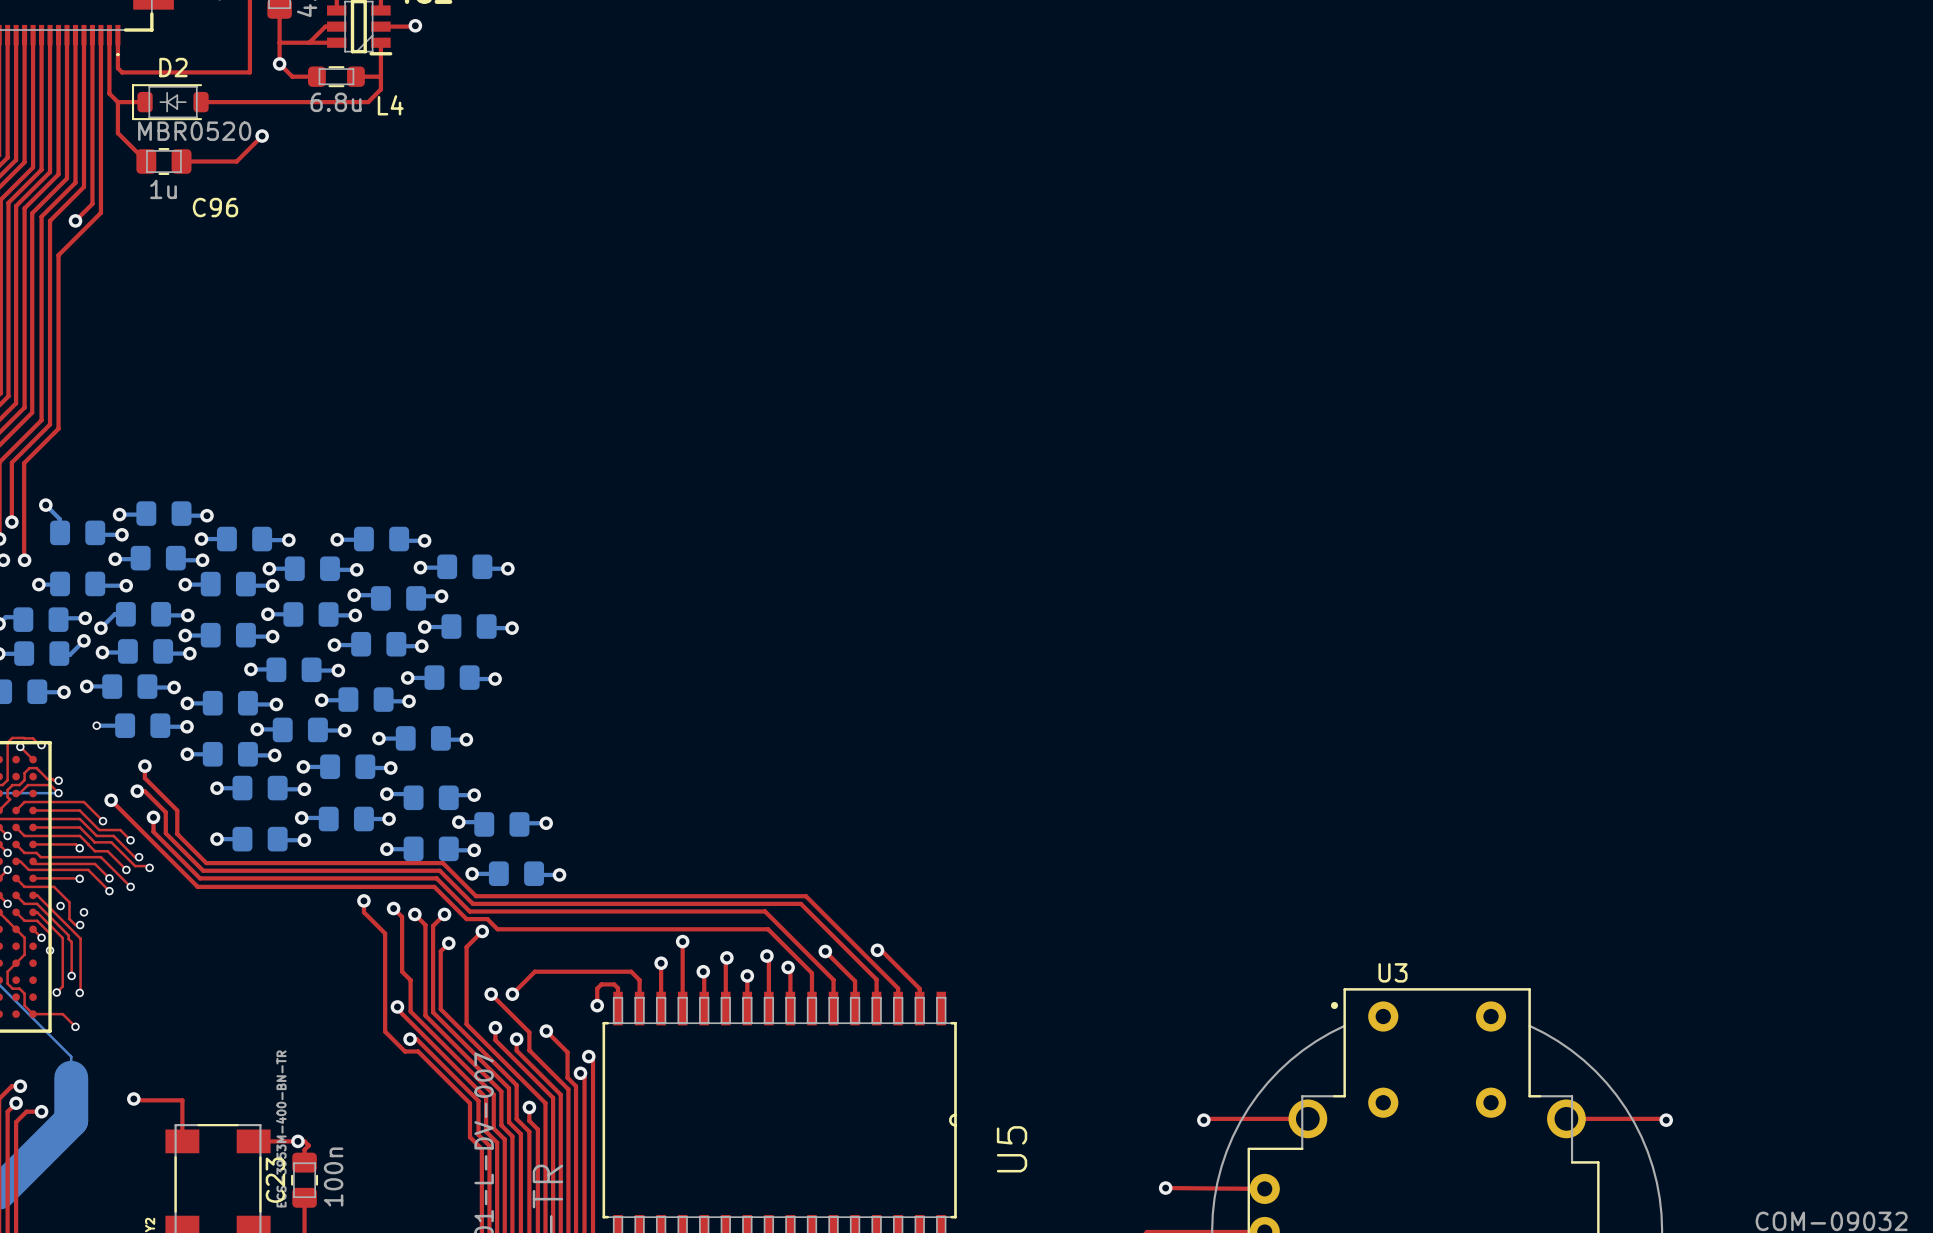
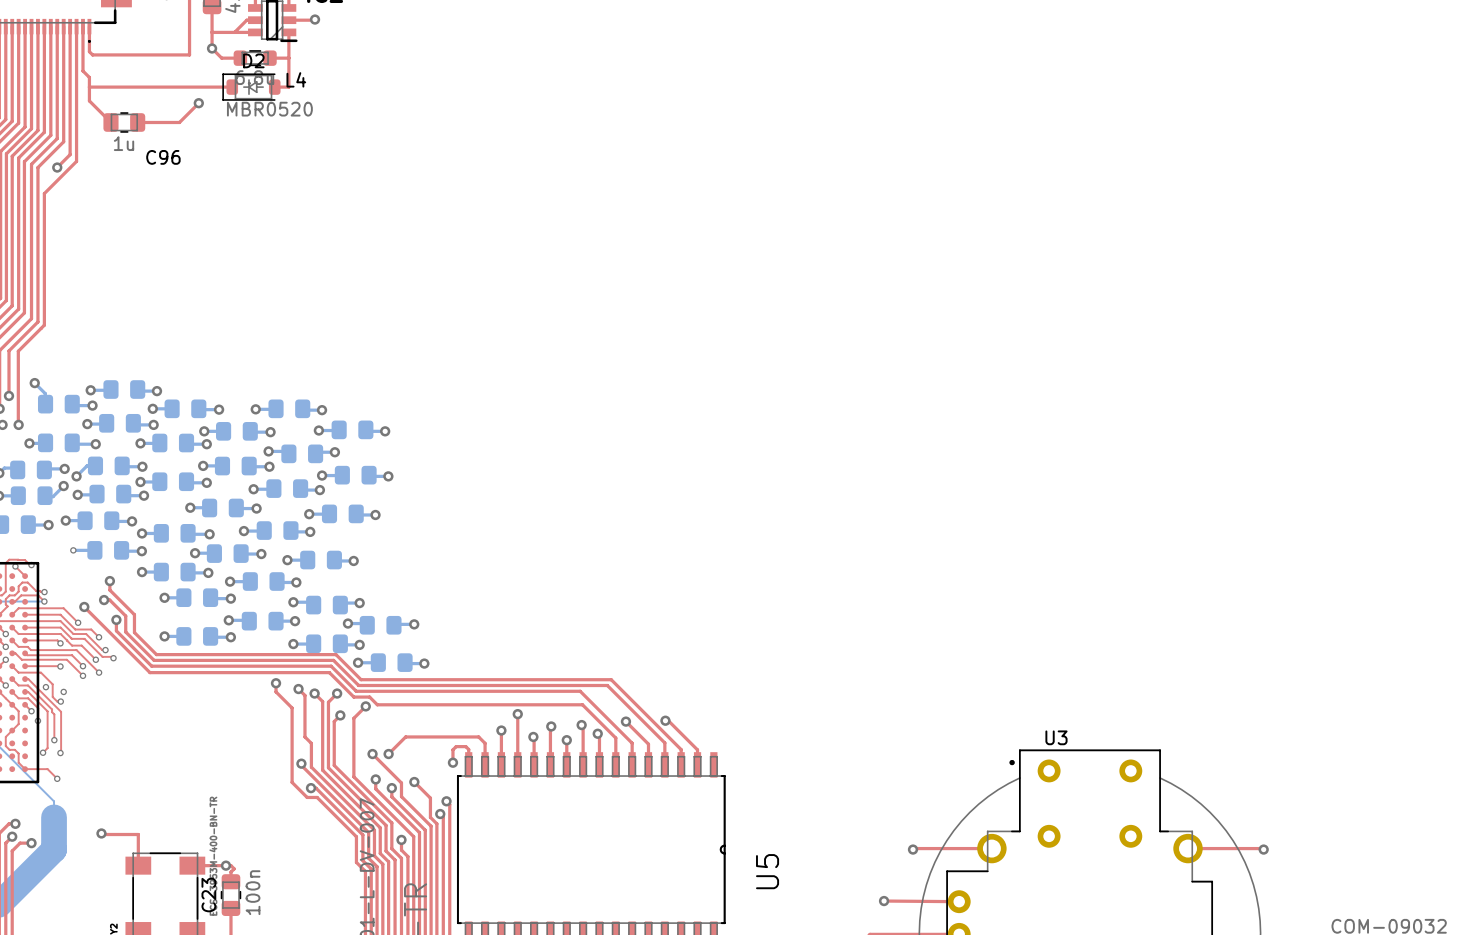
top track: (380, 89) (368, 102) (201, 102) -> (288, 67) (288, 87) (274, 87)
top track: (117, 102) (145, 102) -> none
D2 position: (170, 102) -> (251, 87)
top track: none -> (89, 87) (232, 87)

